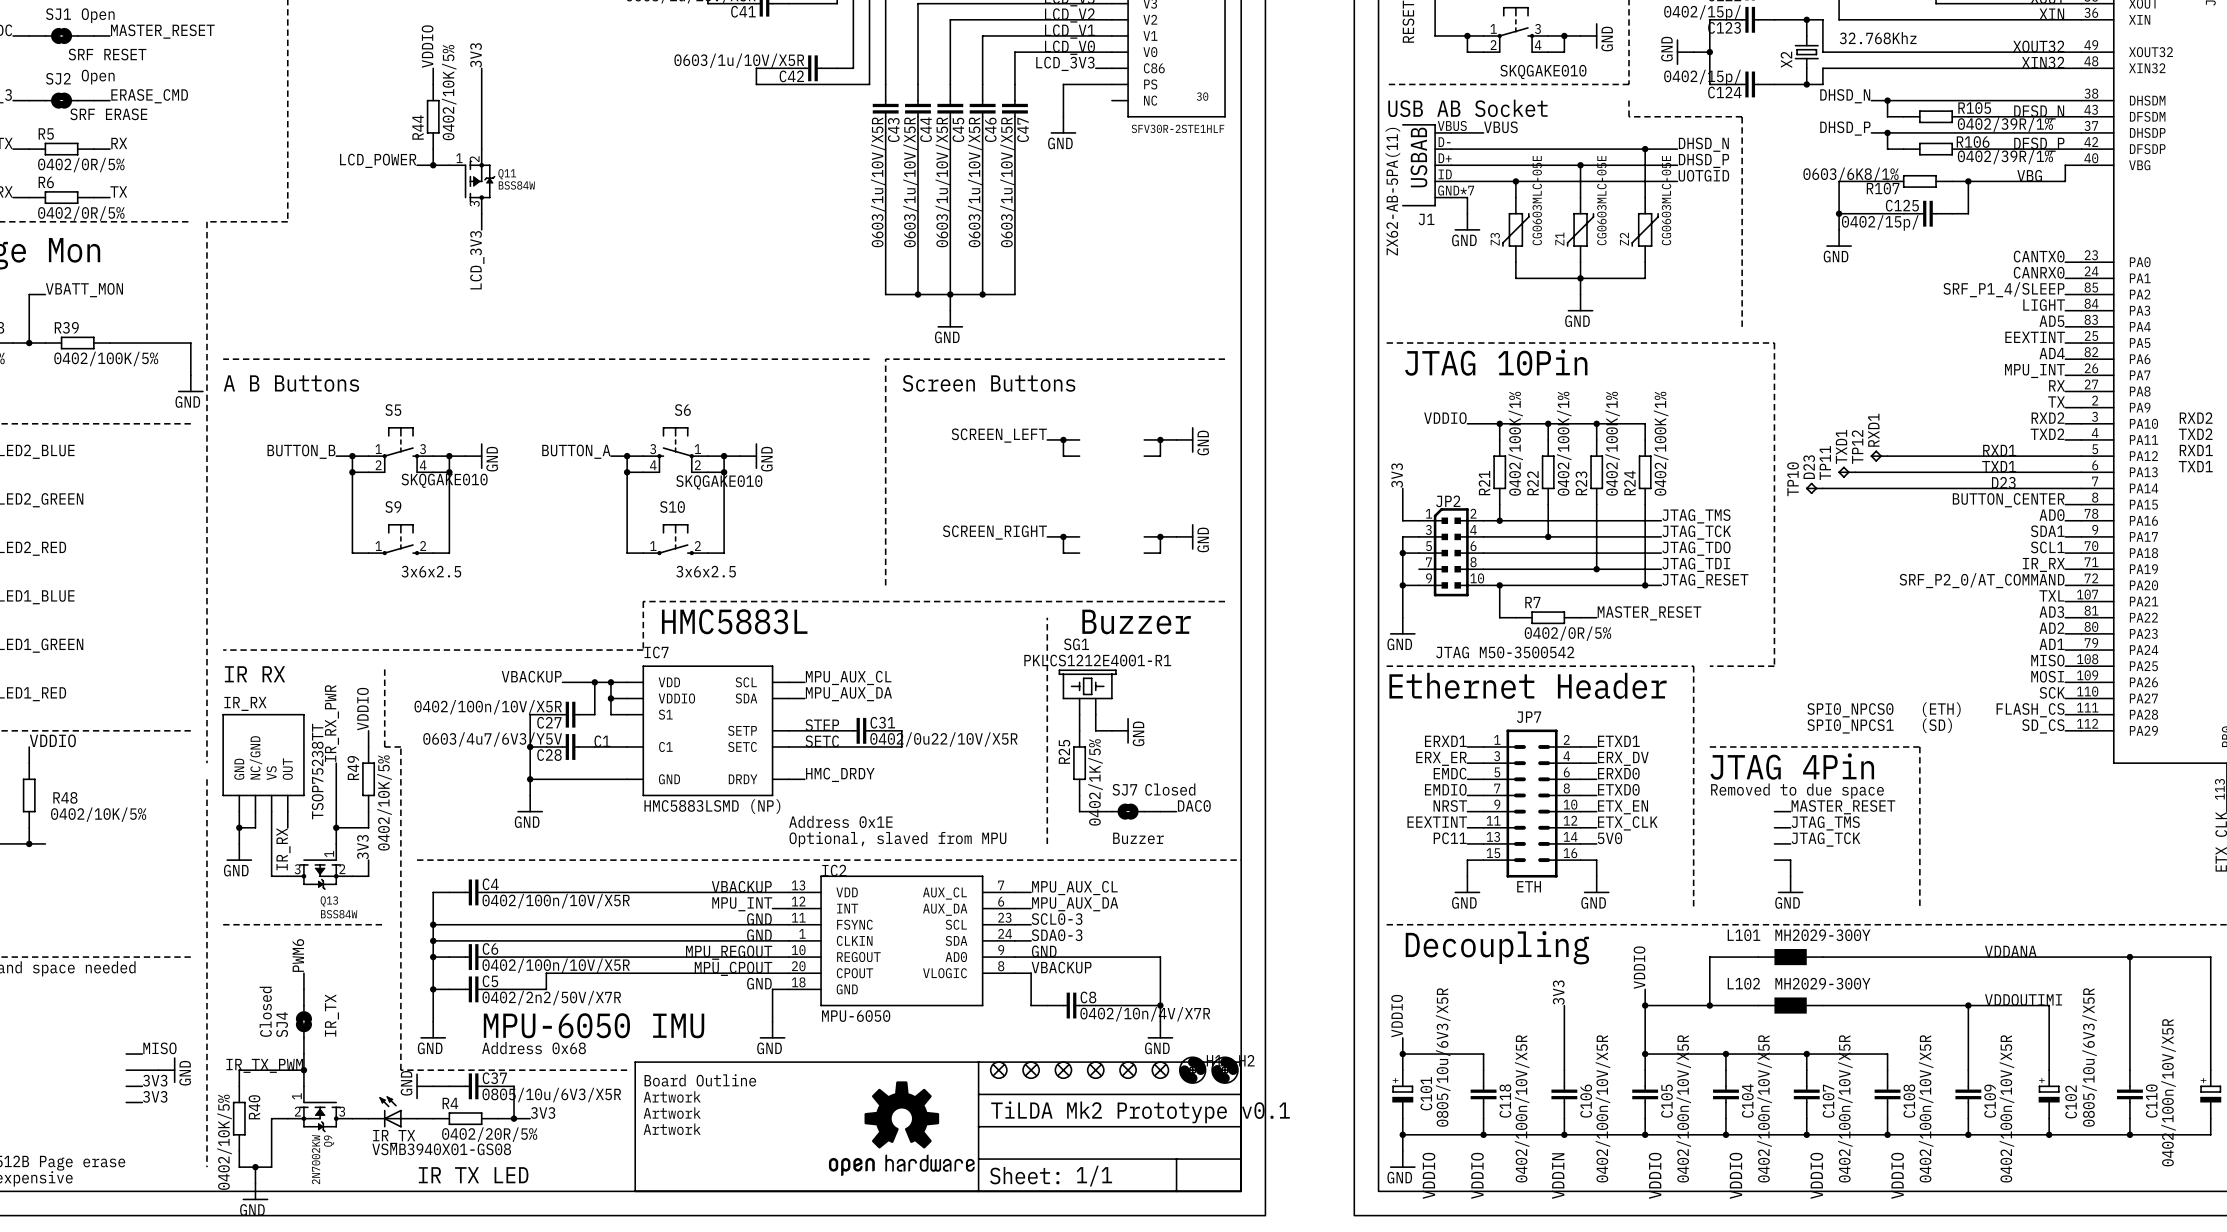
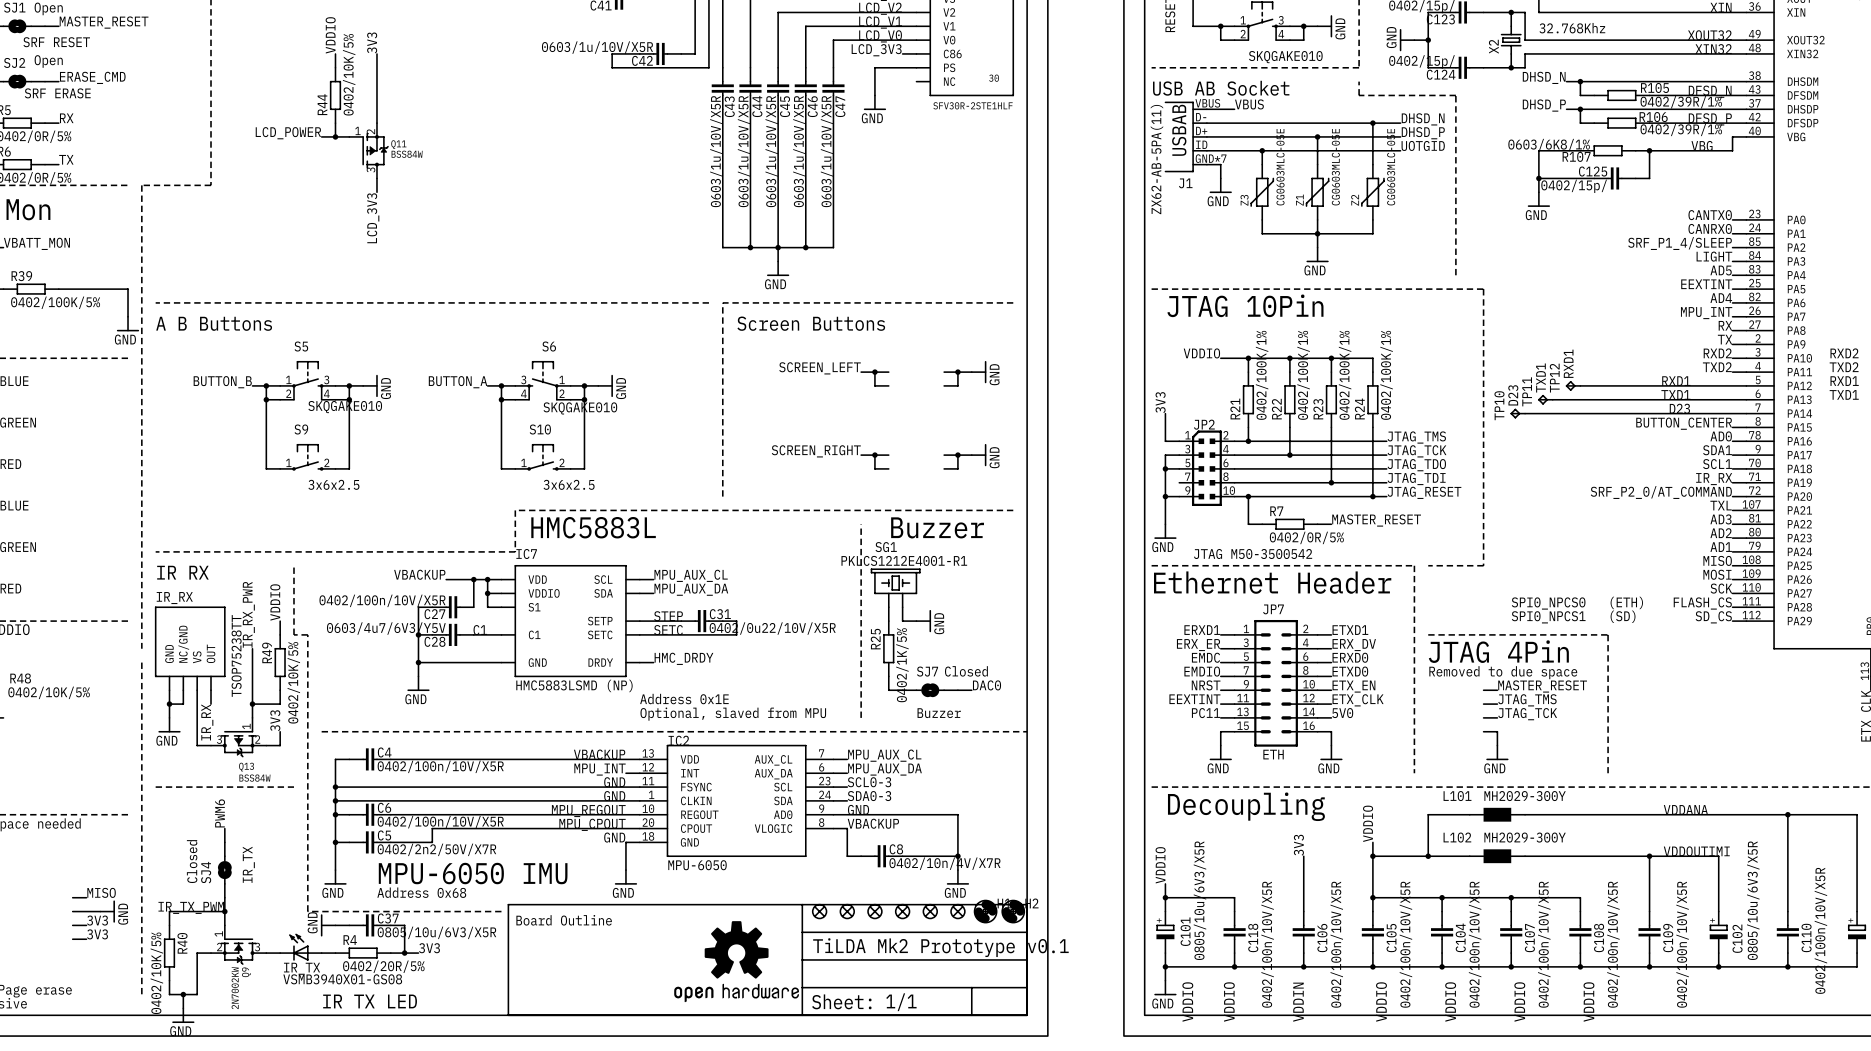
part: (672, 1096) -> none
part: (672, 1113) -> none
part: (672, 1129) -> none

